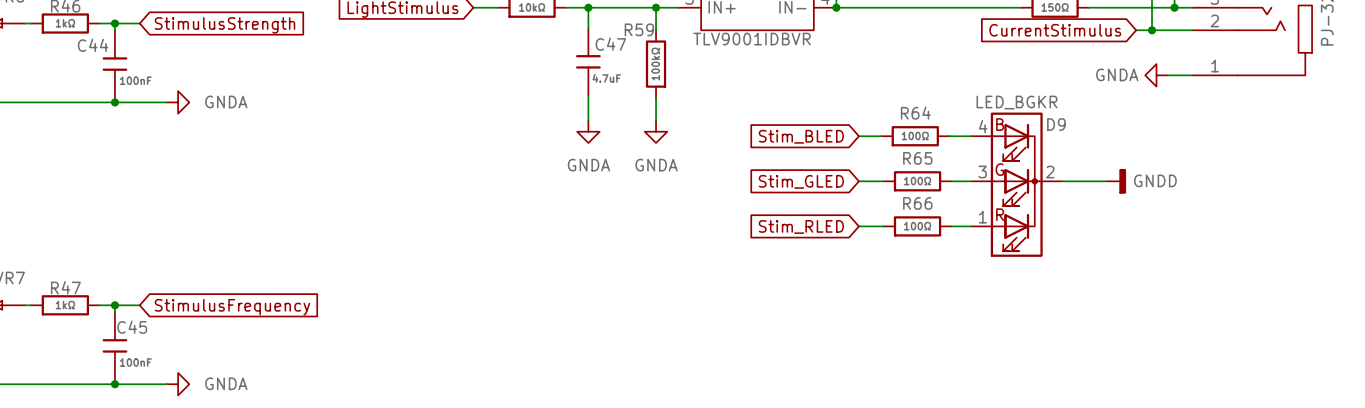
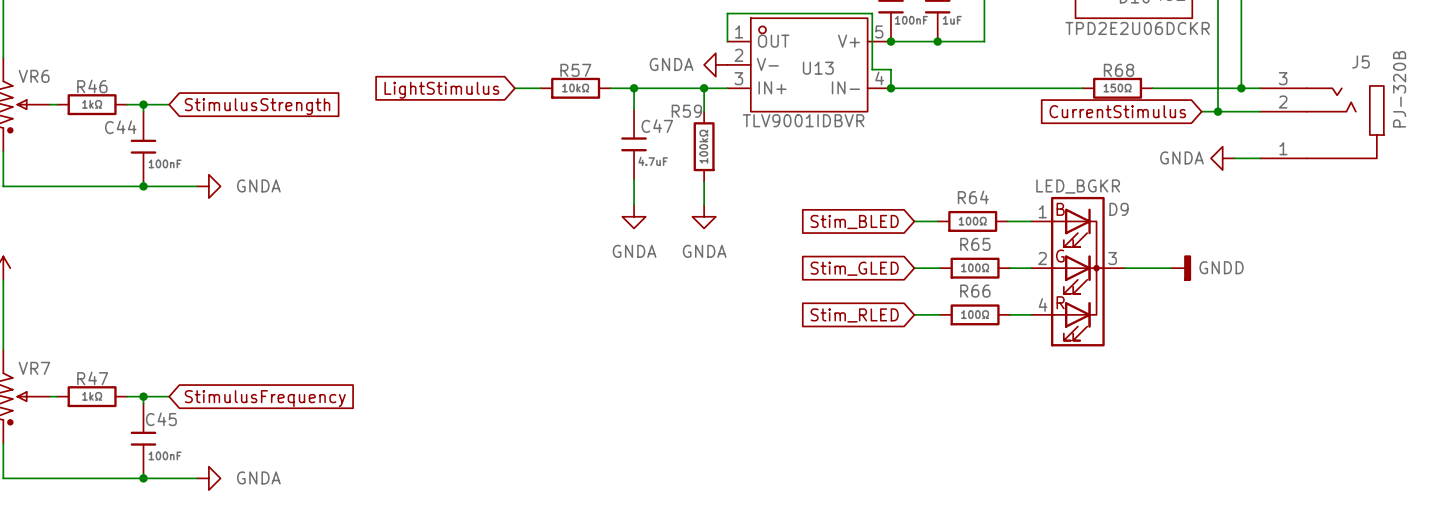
D9 pin number: 4 (983, 126) -> 1 (1042, 211)
D9 pin number: 3 (982, 172) -> 2 (1042, 258)
D9 pin number: 2 (1050, 172) -> 3 (1112, 258)
D9 pin number: 1 (982, 217) -> 4 (1043, 304)

